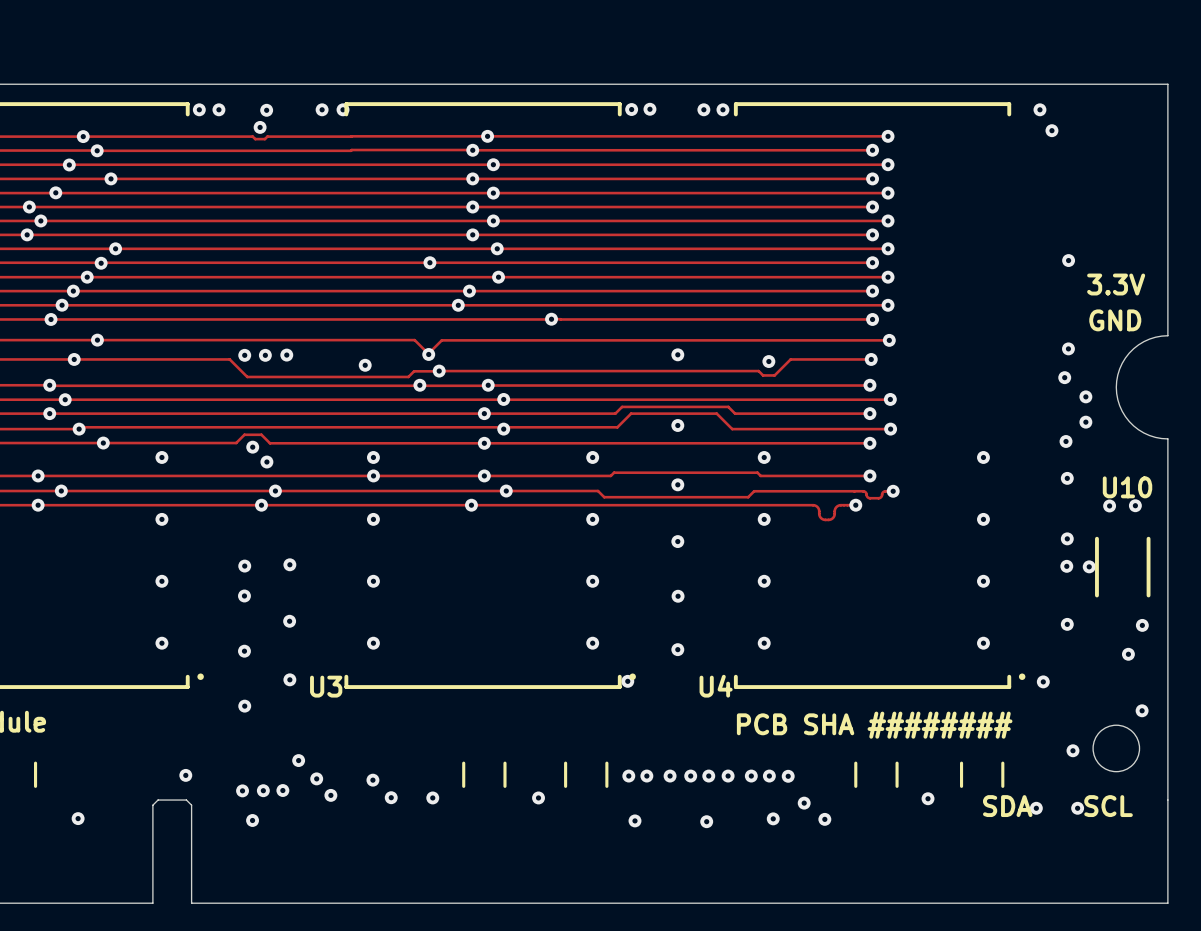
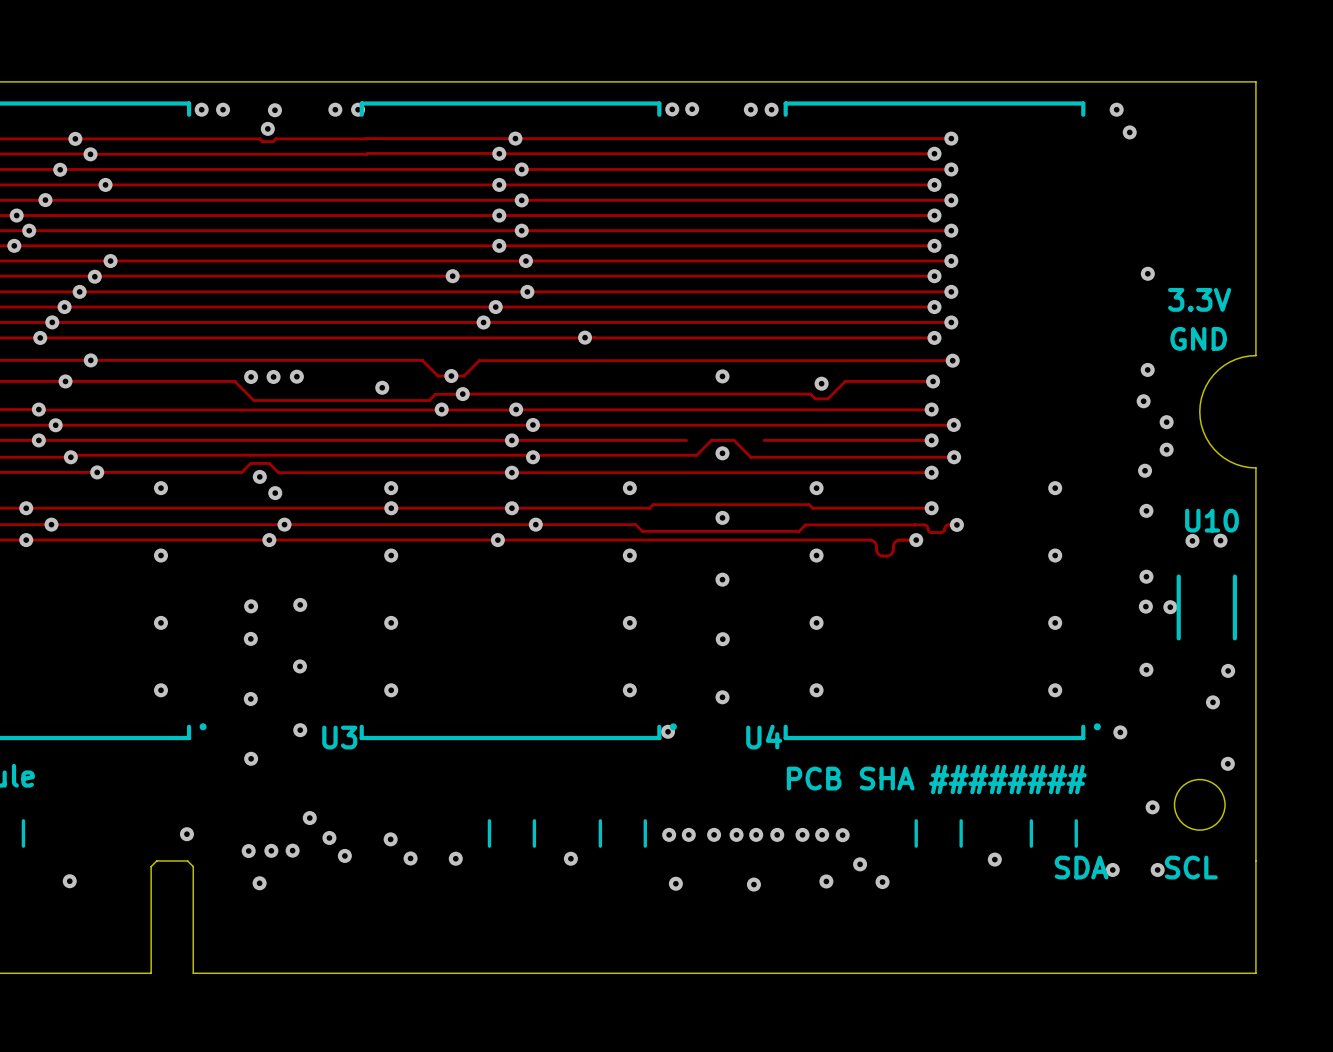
track: (402, 340) (414, 340) (428, 354) -> (422, 360) (438, 376) (464, 376) (479, 360)
track: (454, 340) (441, 340) (428, 354) -> none
track: (615, 413) (622, 406) (728, 406) (735, 413) -> none
track: (631, 413) (617, 427) -> (671, 440) (654, 440)
track: (644, 413) (667, 413) -> (656, 455) (696, 455) (711, 440)
track: (688, 413) (715, 413) -> (734, 440) (750, 457) (781, 457)
track: (716, 413) (732, 429) -> (764, 440) (784, 440)

